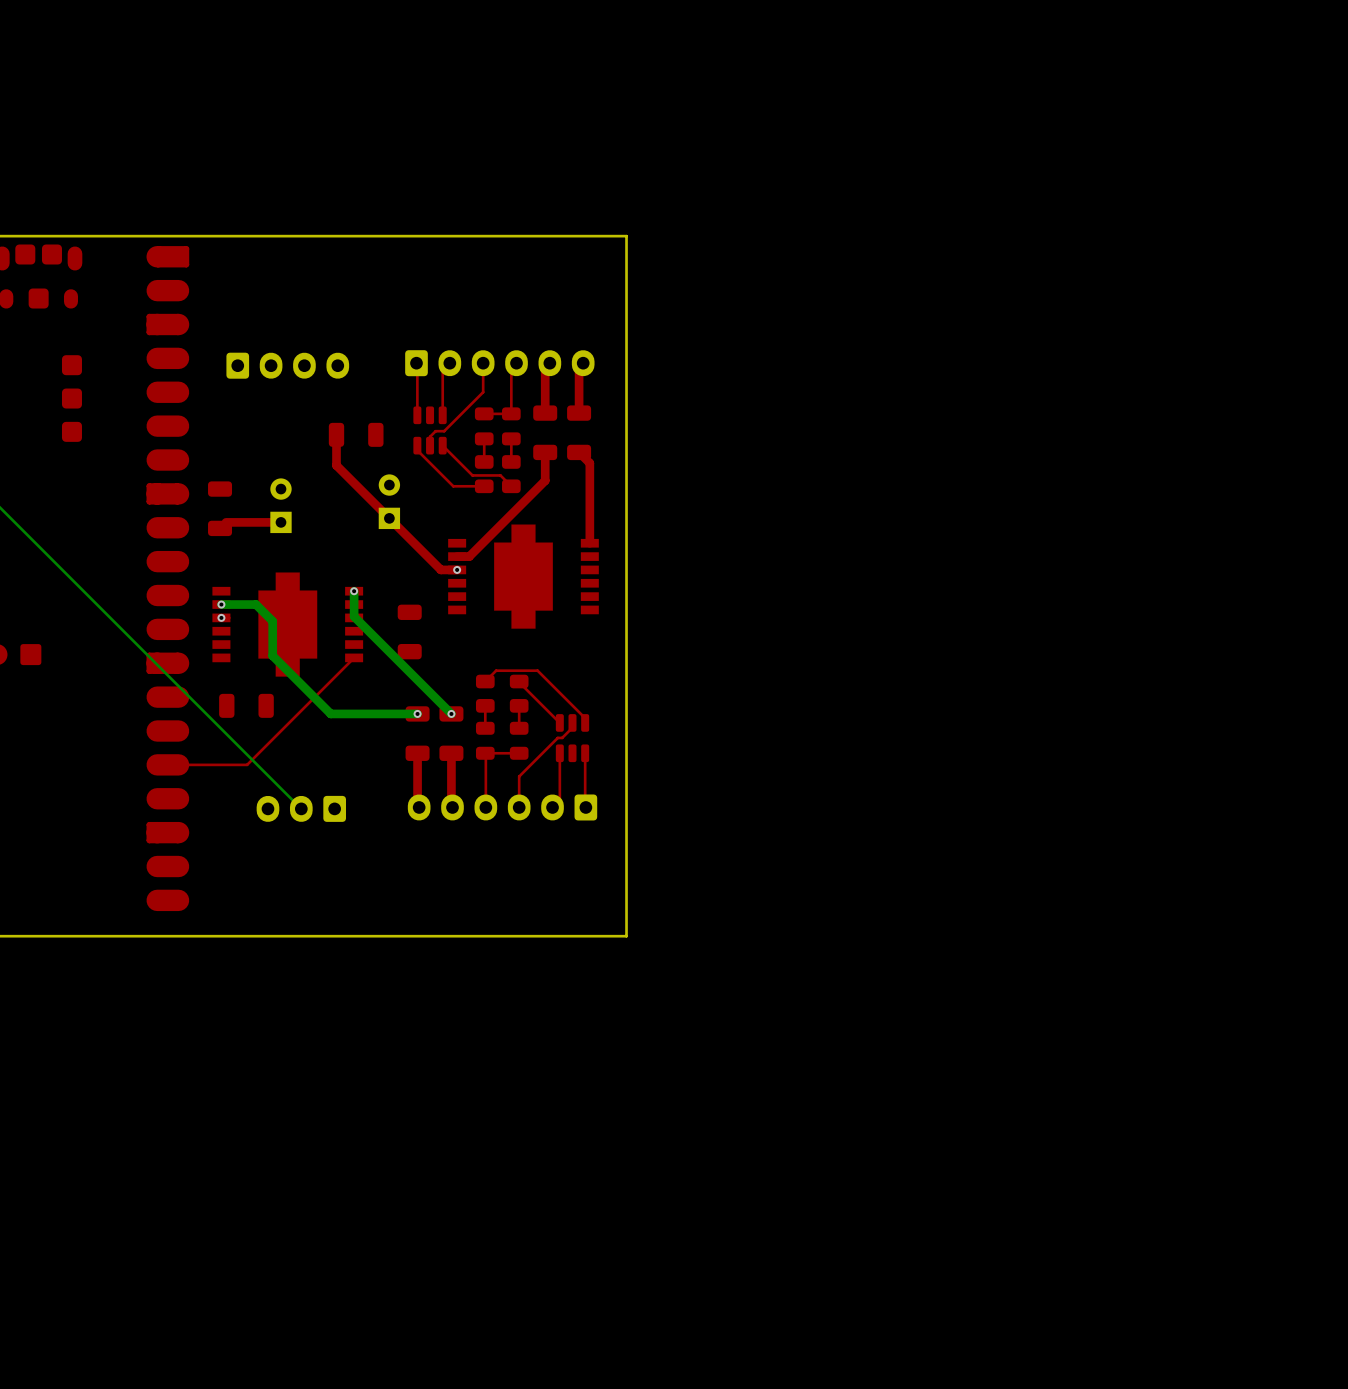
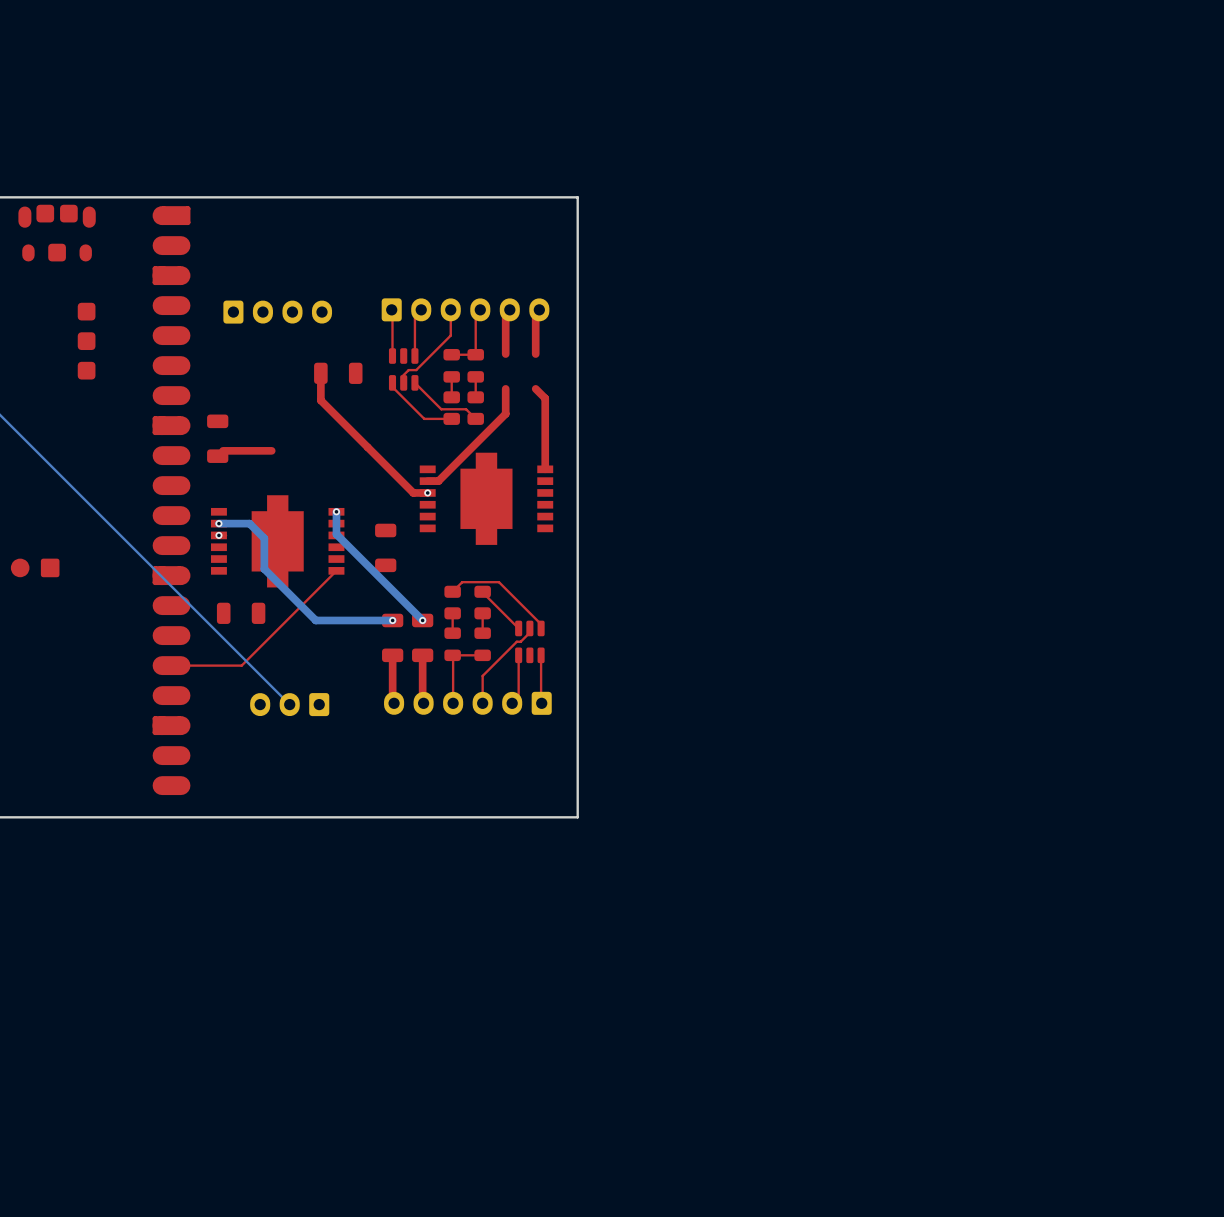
part: (545, 432) -> none
part: (579, 432) -> none
part: (389, 501) -> none
part: (280, 505) -> none

